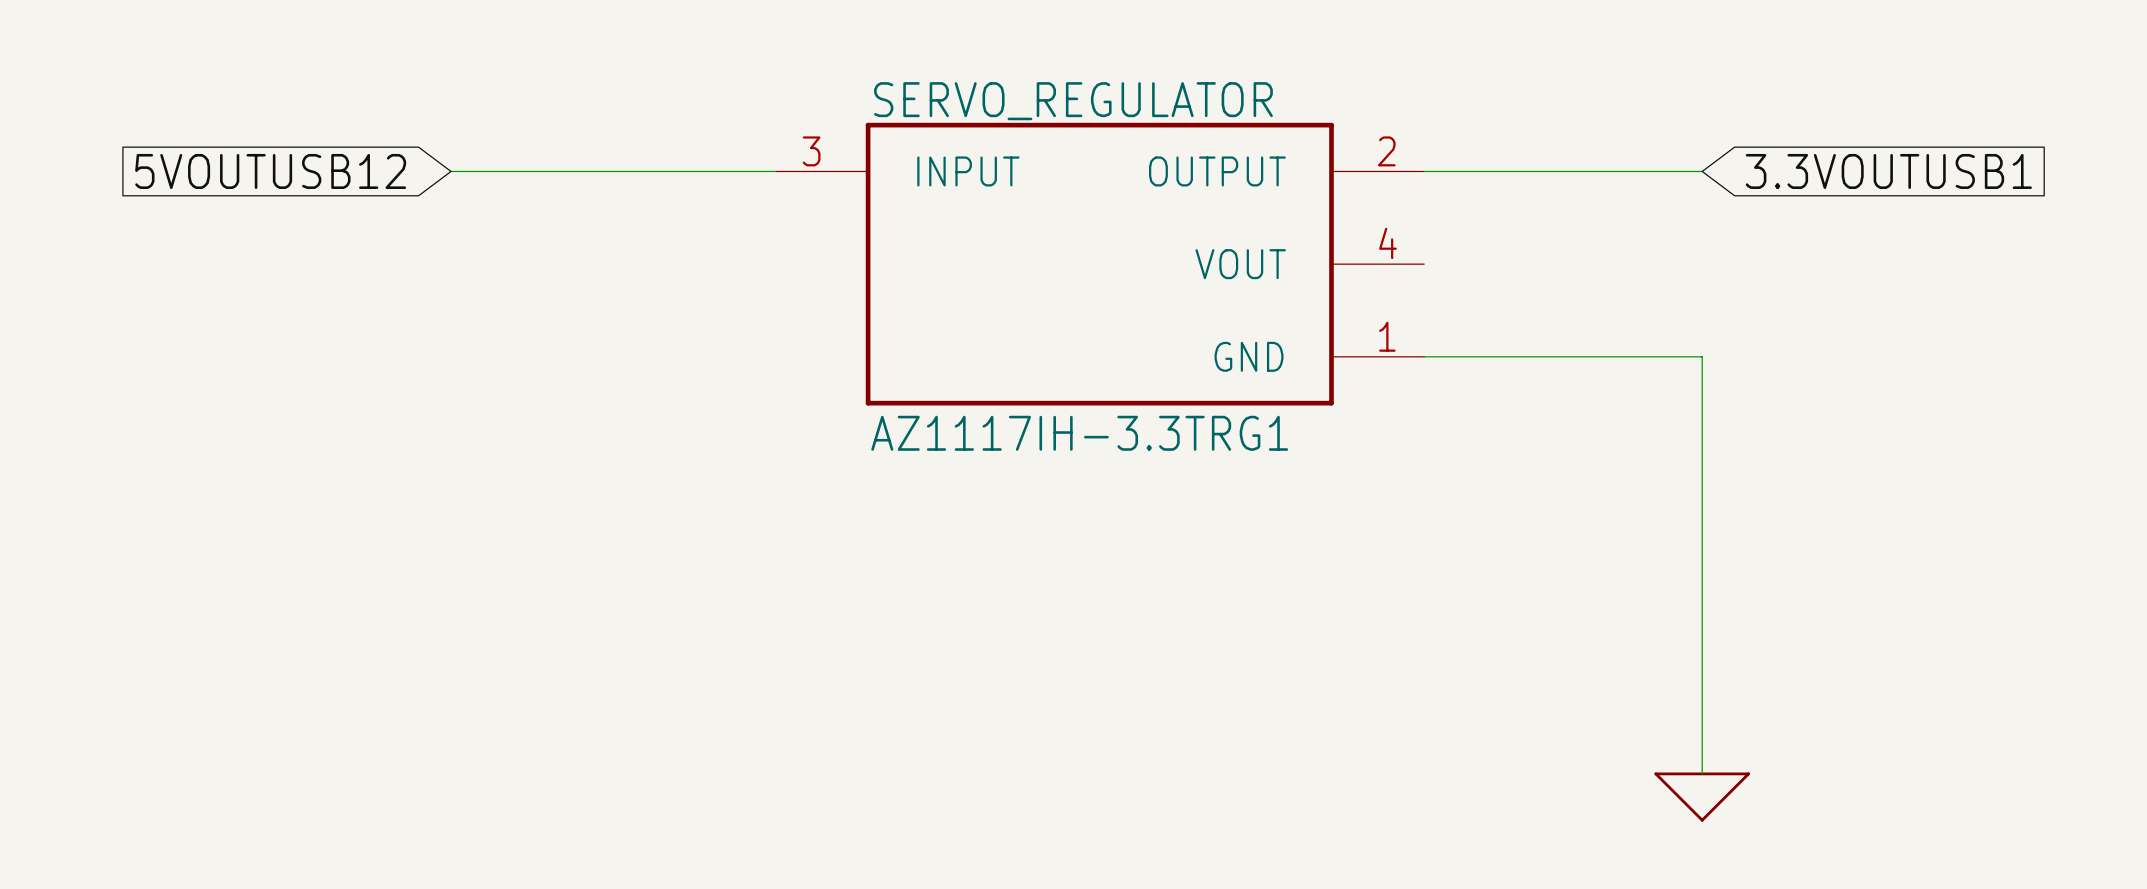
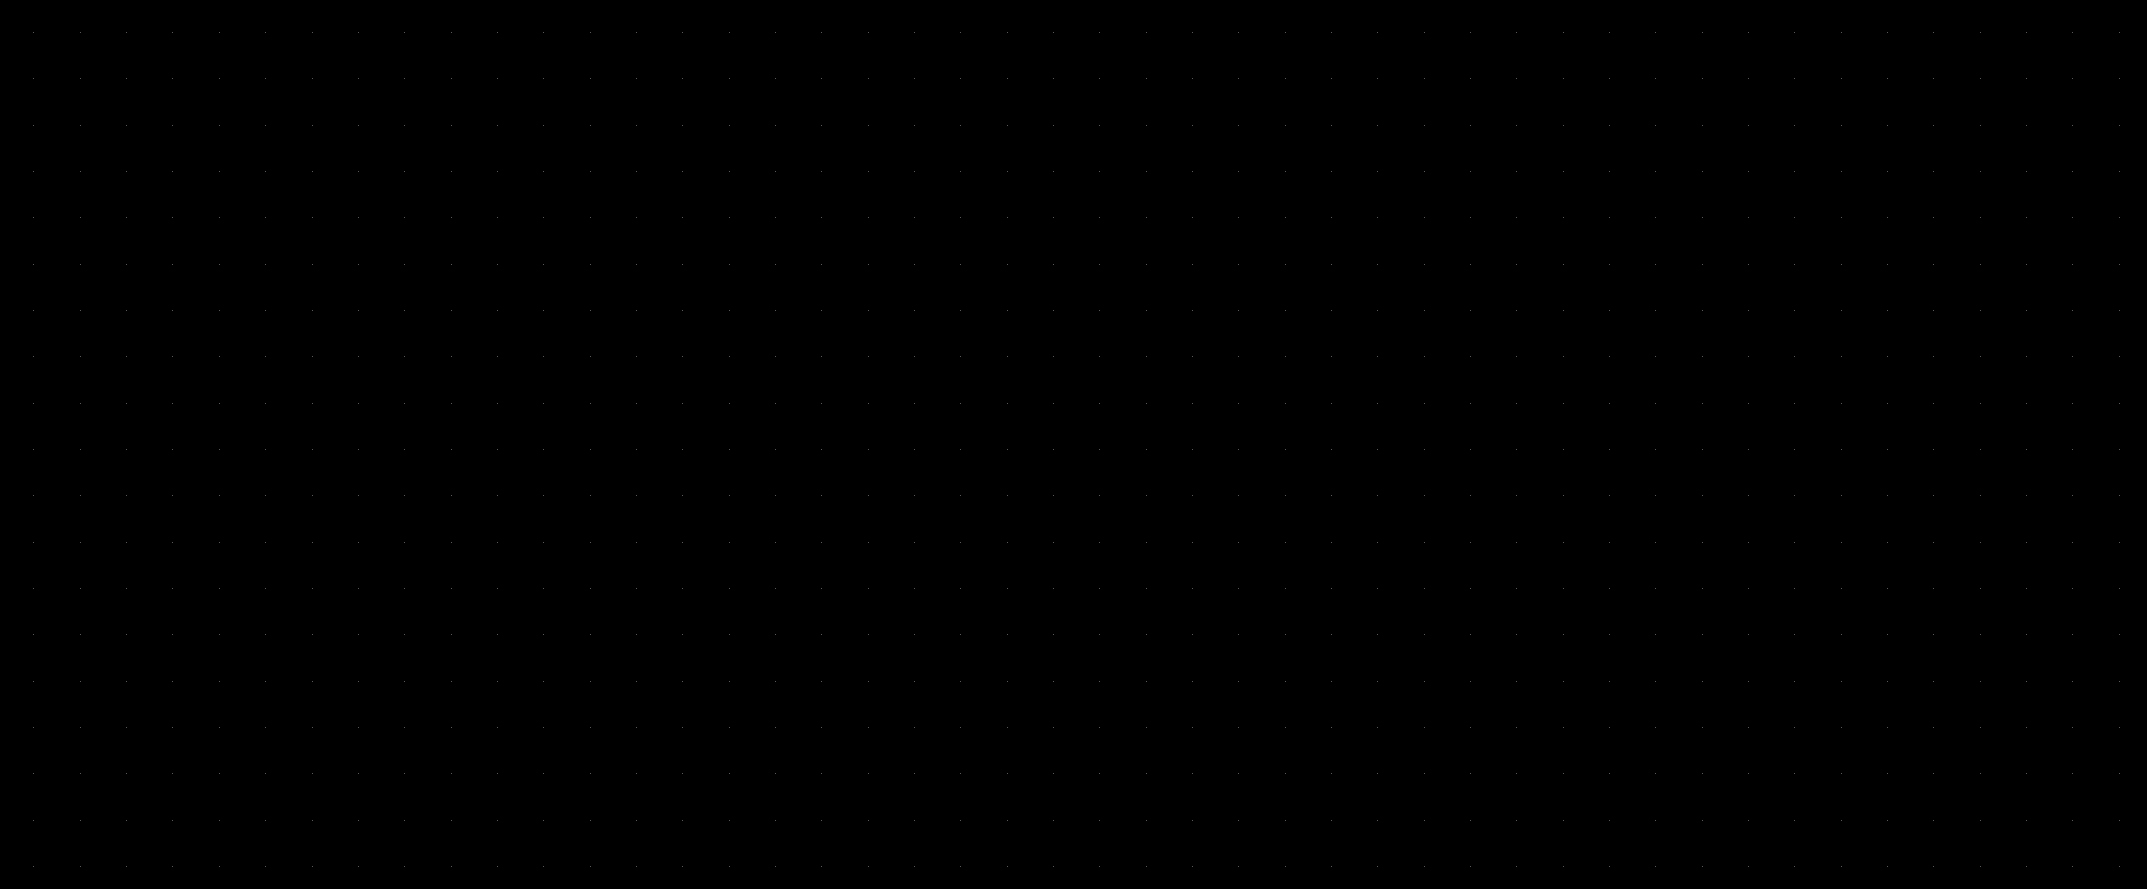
global label: 5VOUTUSB12 (270, 171) -> none
wire: (451, 171) (775, 171) -> none
wire: (1424, 171) (1702, 171) -> none
global label: 3.3VOUTUSB1 (1888, 171) -> none
SERVO_REGULATOR: AZ1117IH-3.3TRG1 (1099, 264) -> none
wire: (1424, 356) (1702, 356) (1702, 773) -> none
power symbol: (1702, 797) -> none

